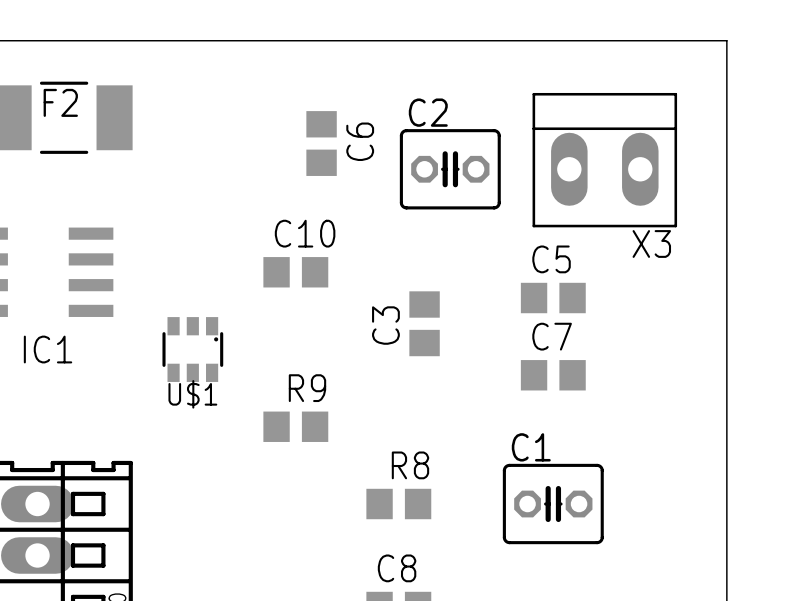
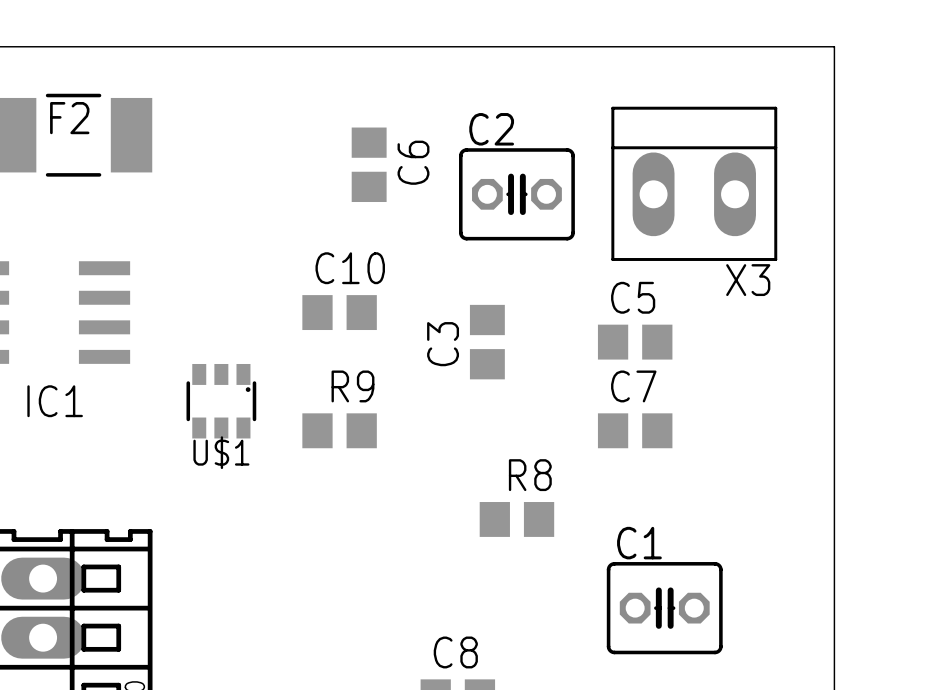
C3 position: (424, 323) -> (487, 342)
R9 position: (295, 426) -> (339, 430)
R8 position: (398, 504) -> (516, 519)
C1 position: (553, 504) -> (664, 608)

